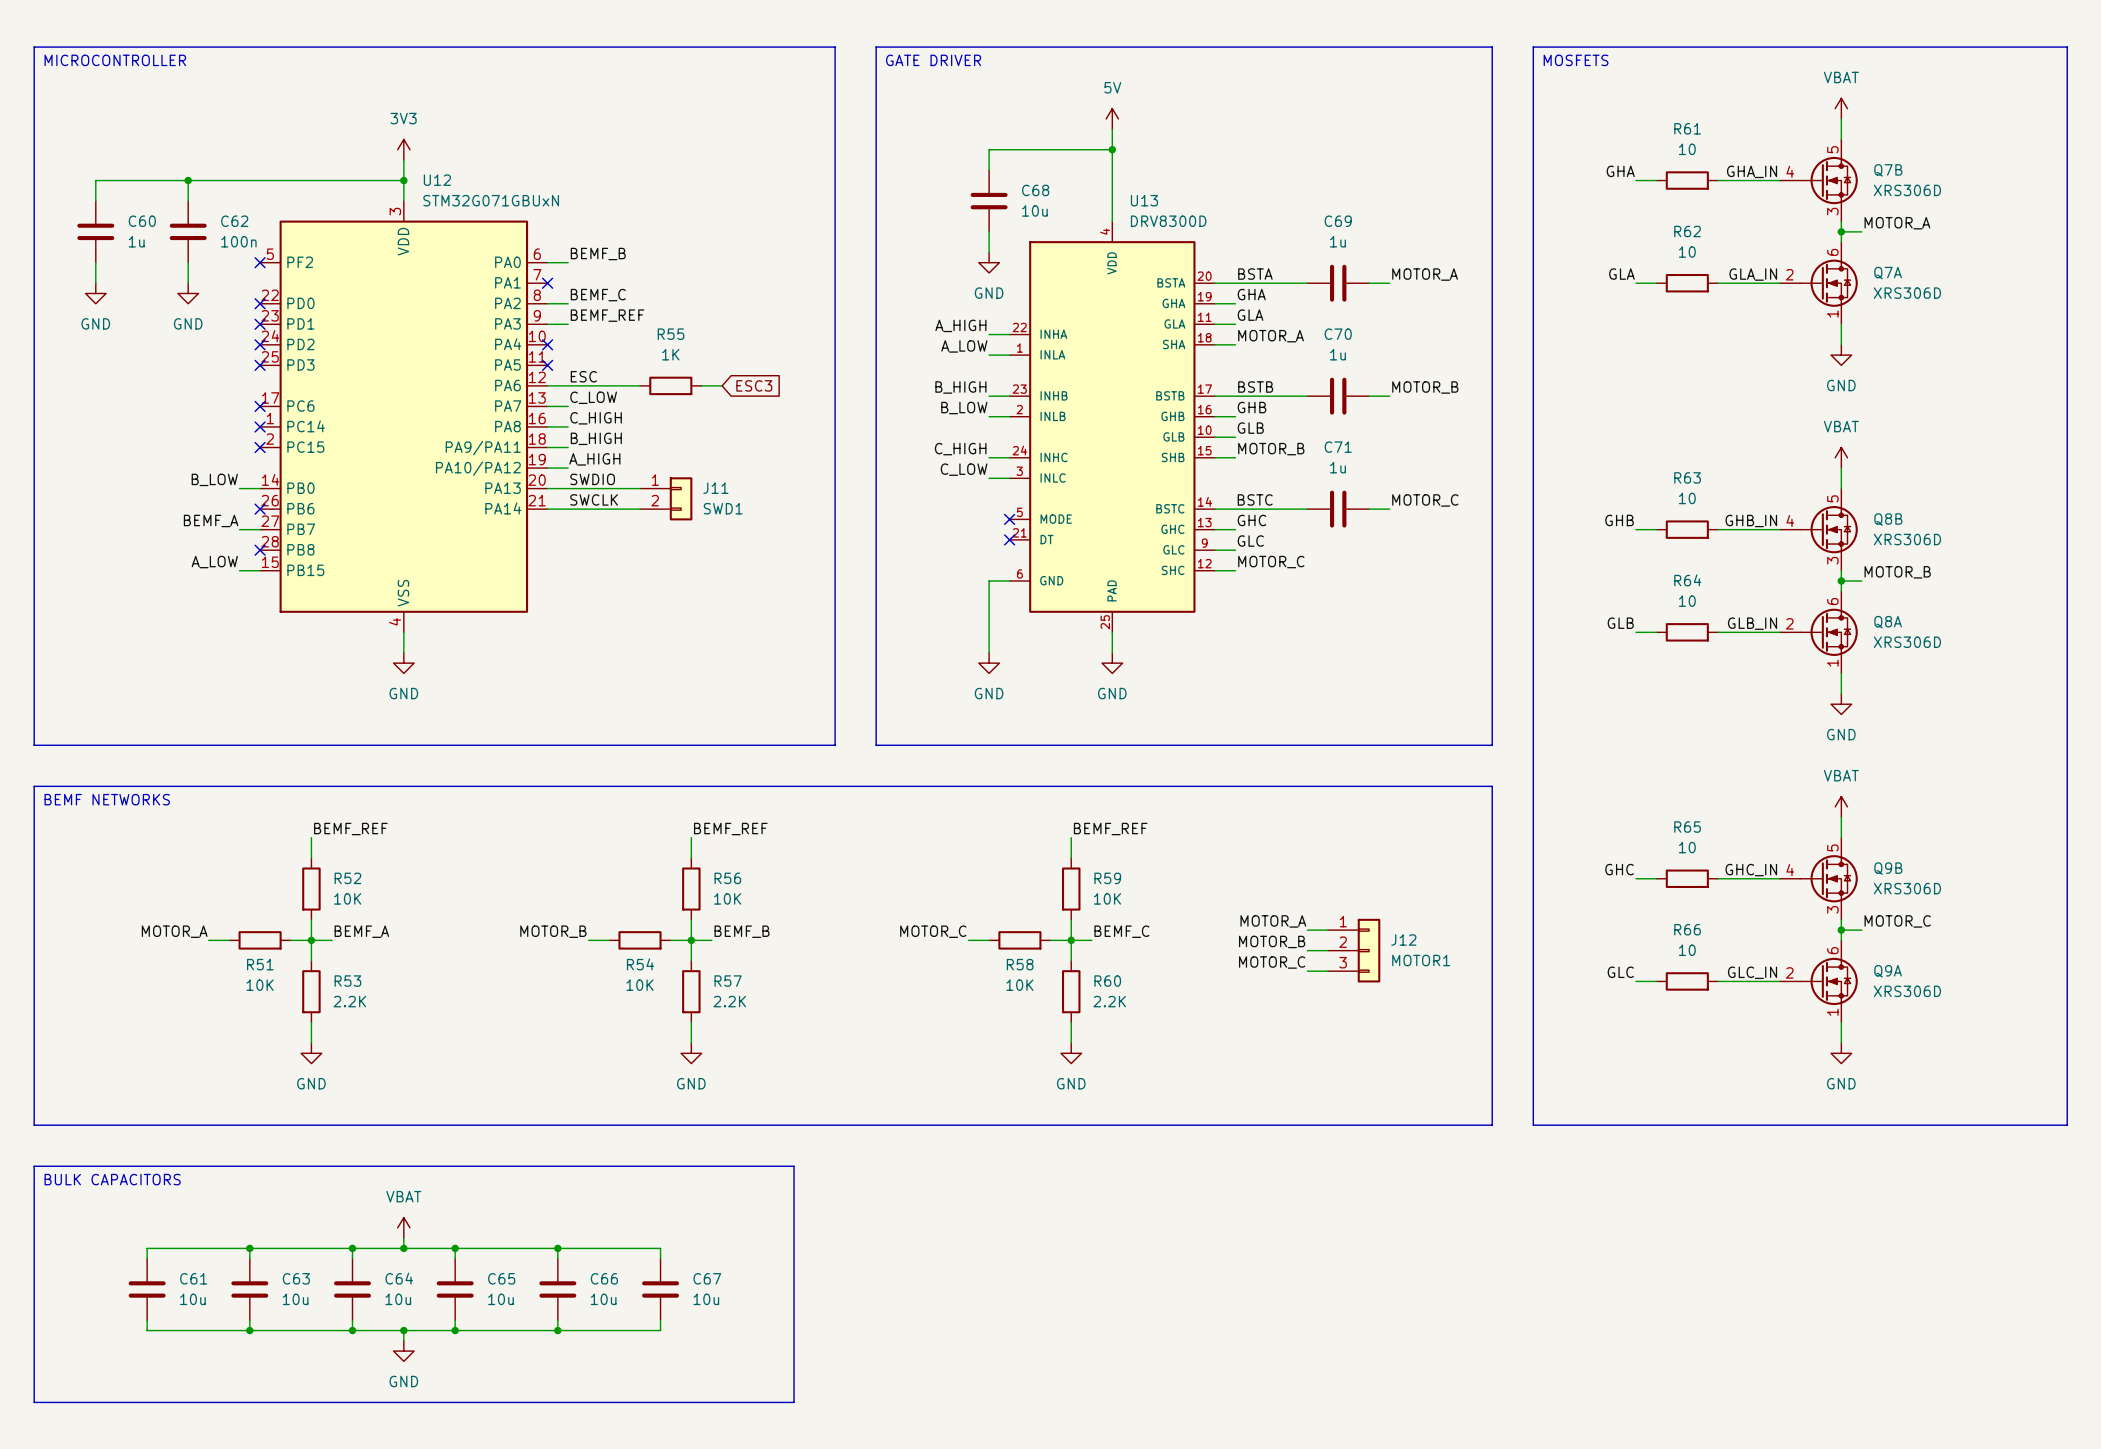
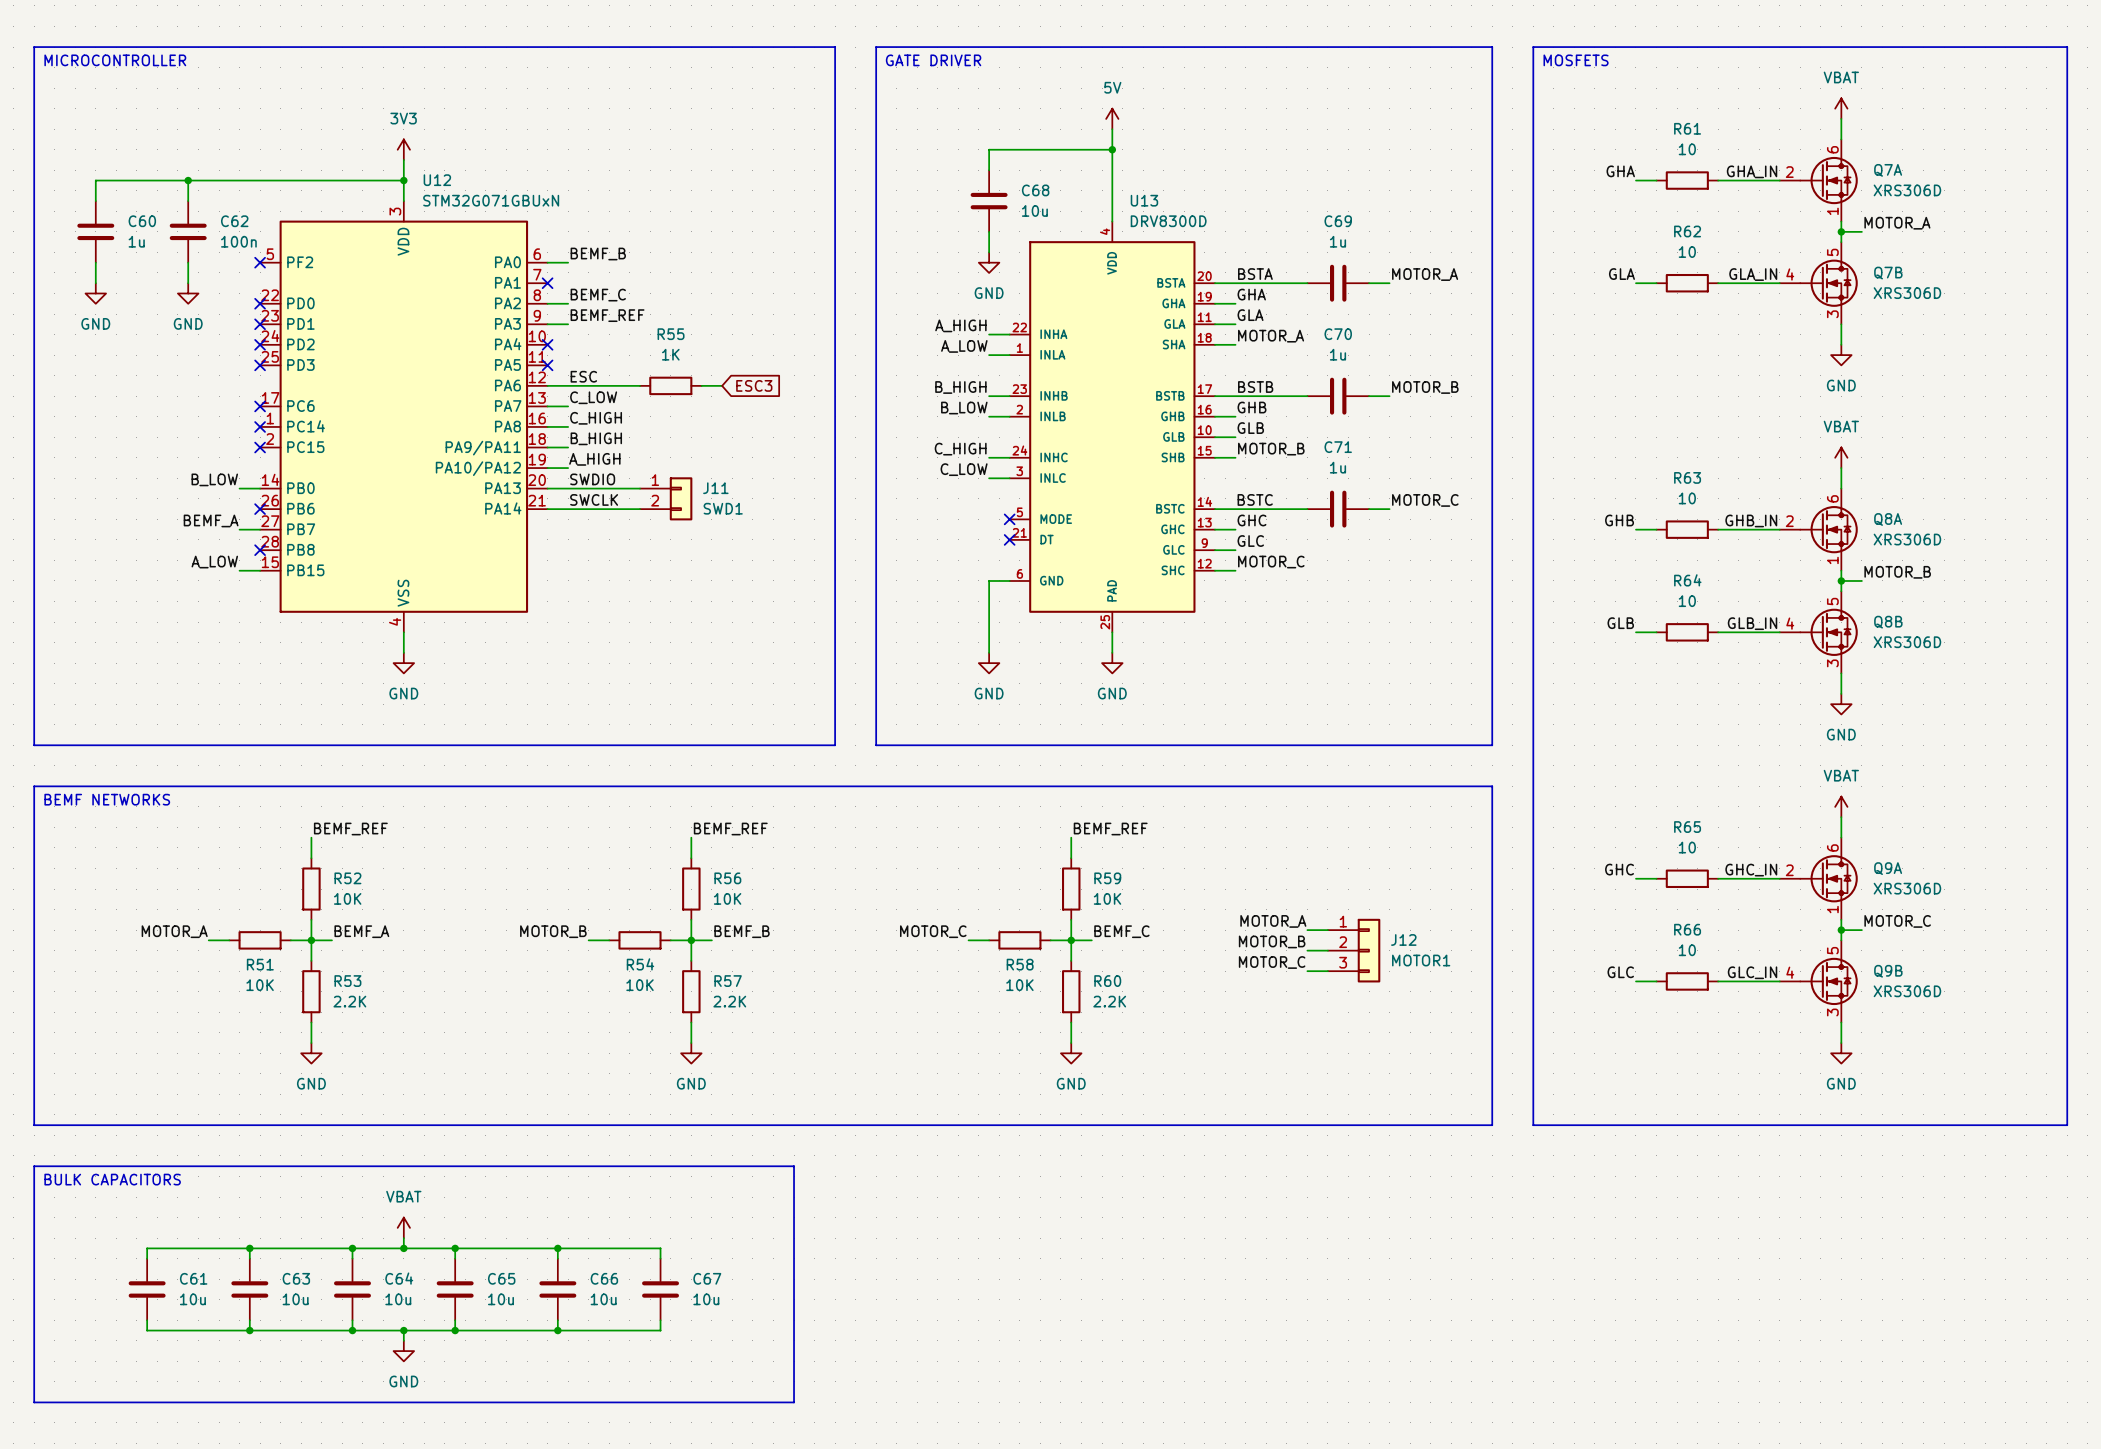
Q7B position: (1818, 180) -> (1818, 283)
Q7A position: (1818, 283) -> (1818, 180)
Q8B position: (1818, 529) -> (1818, 632)
Q8A position: (1818, 632) -> (1818, 529)
Q9B position: (1818, 878) -> (1818, 981)
Q9A position: (1818, 981) -> (1818, 878)

